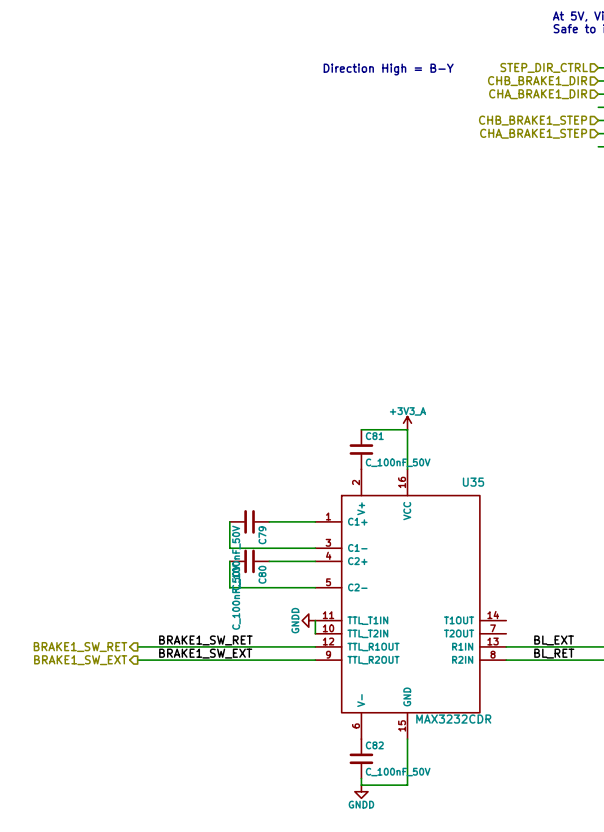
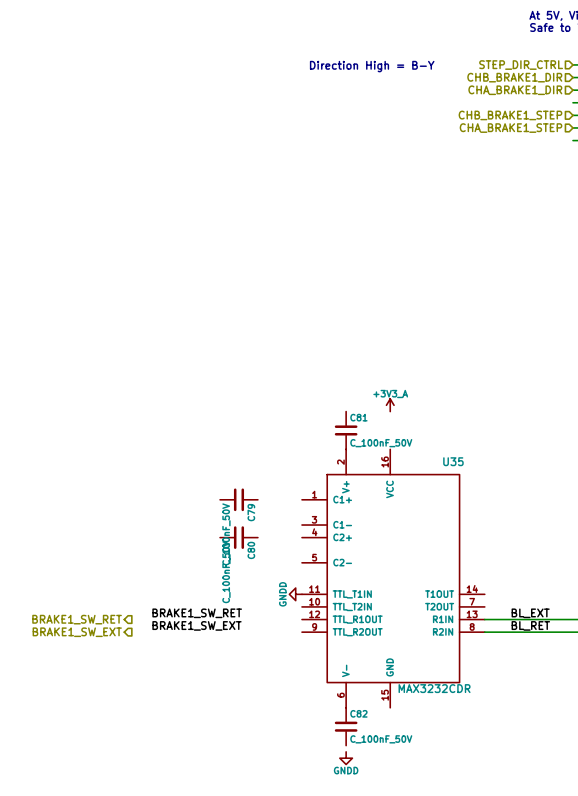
wire: (361, 429) (407, 429) (407, 469) -> none
wire: (229, 521) (229, 548) (315, 548) -> none
wire: (269, 521) (315, 521) -> none
wire: (229, 561) (229, 587) (315, 587) -> none
wire: (269, 561) (315, 561) -> none
wire: (315, 620) (315, 633) -> none
wire: (137, 646) (315, 646) -> none
wire: (137, 660) (315, 660) -> none
wire: (407, 739) (407, 785) (361, 785) (361, 778) -> none

